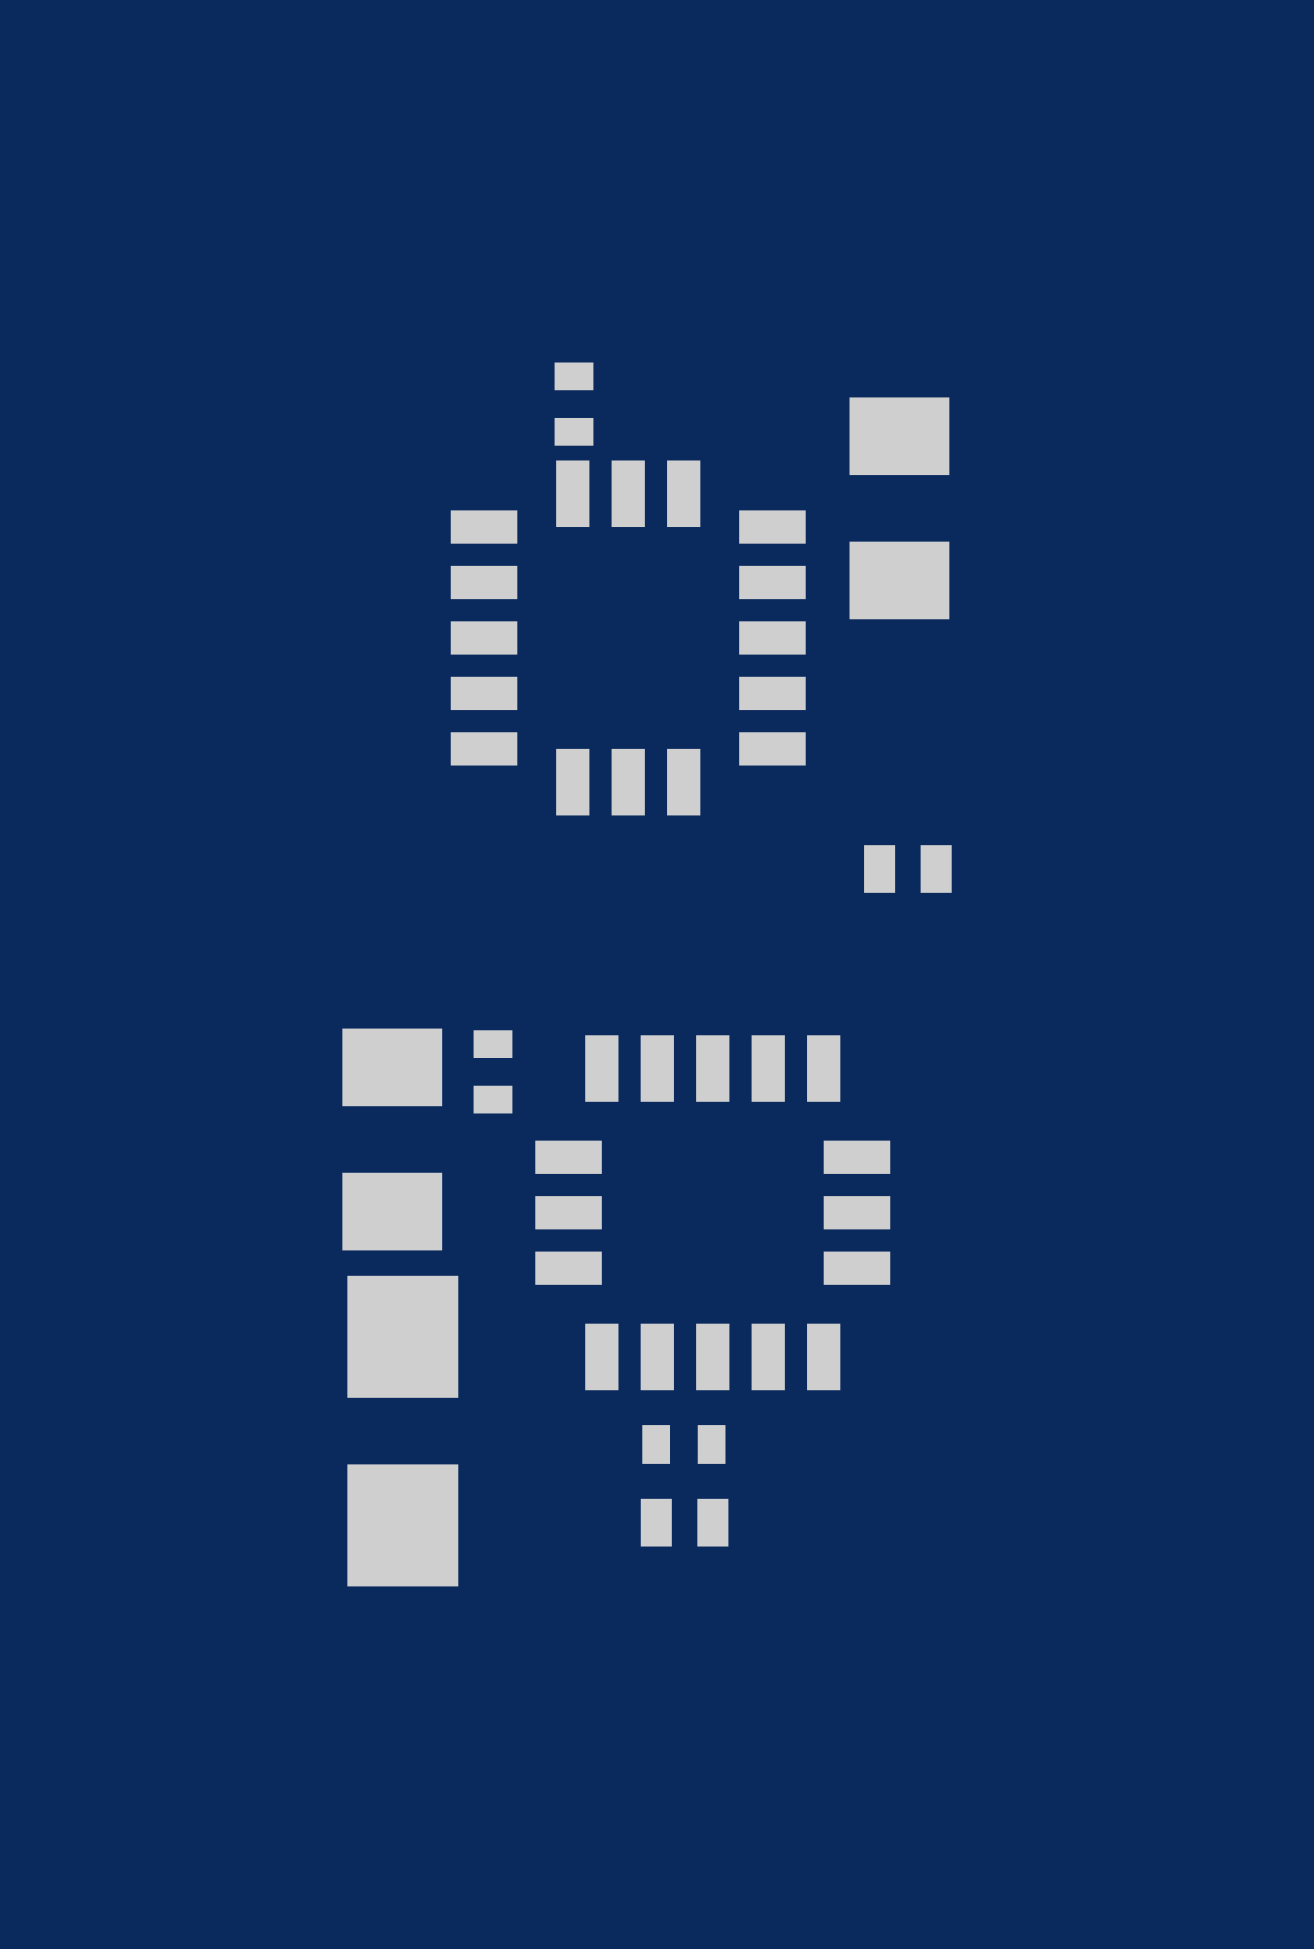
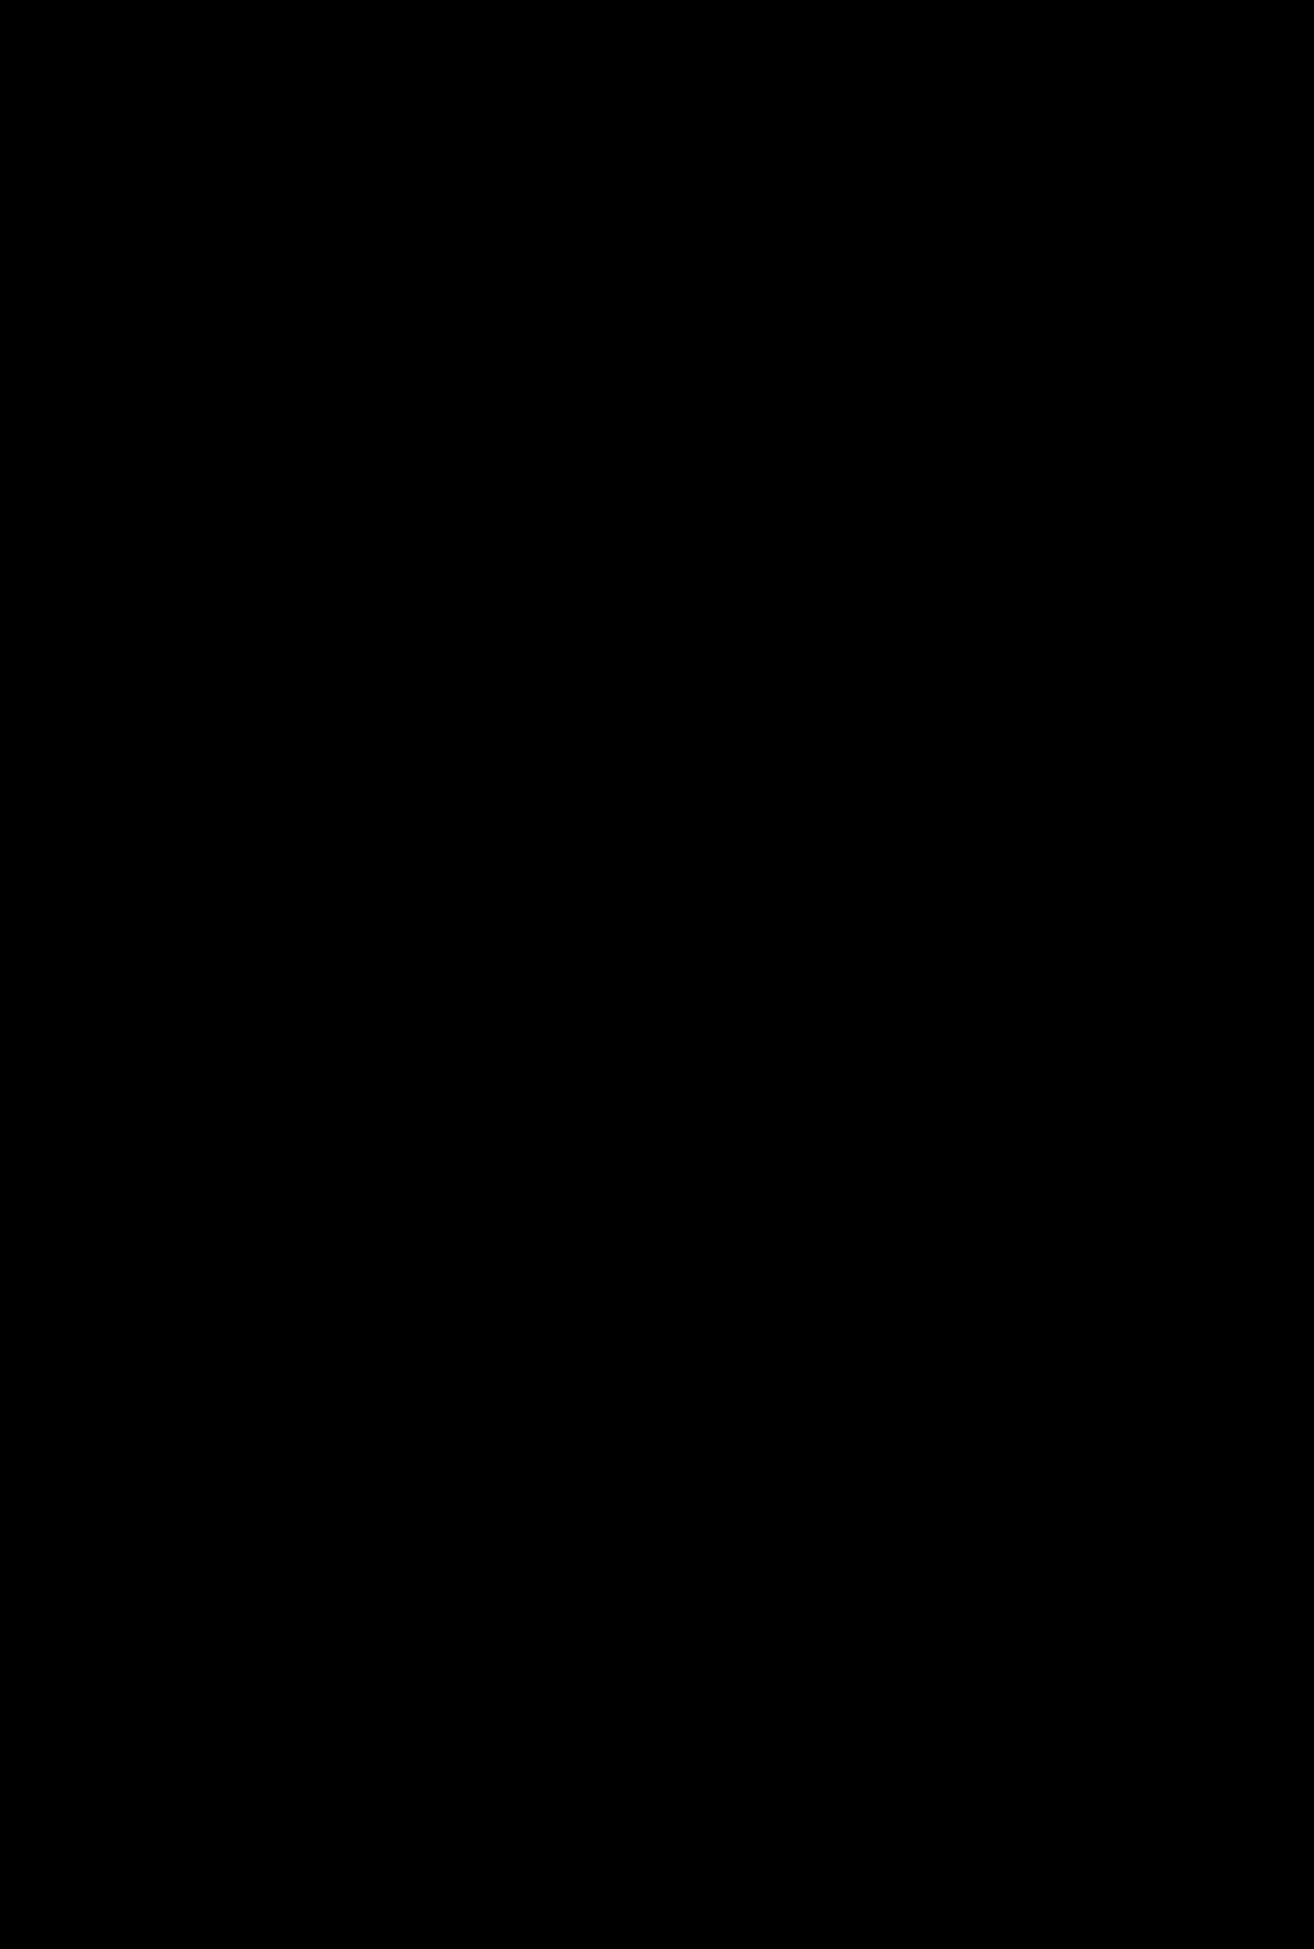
part: (573, 404) -> none
part: (899, 508) -> none
part: (628, 637) -> none
part: (907, 869) -> none
part: (492, 1071) -> none
part: (392, 1139) -> none
part: (712, 1212) -> none
part: (402, 1431) -> none
part: (683, 1444) -> none
part: (684, 1522) -> none

